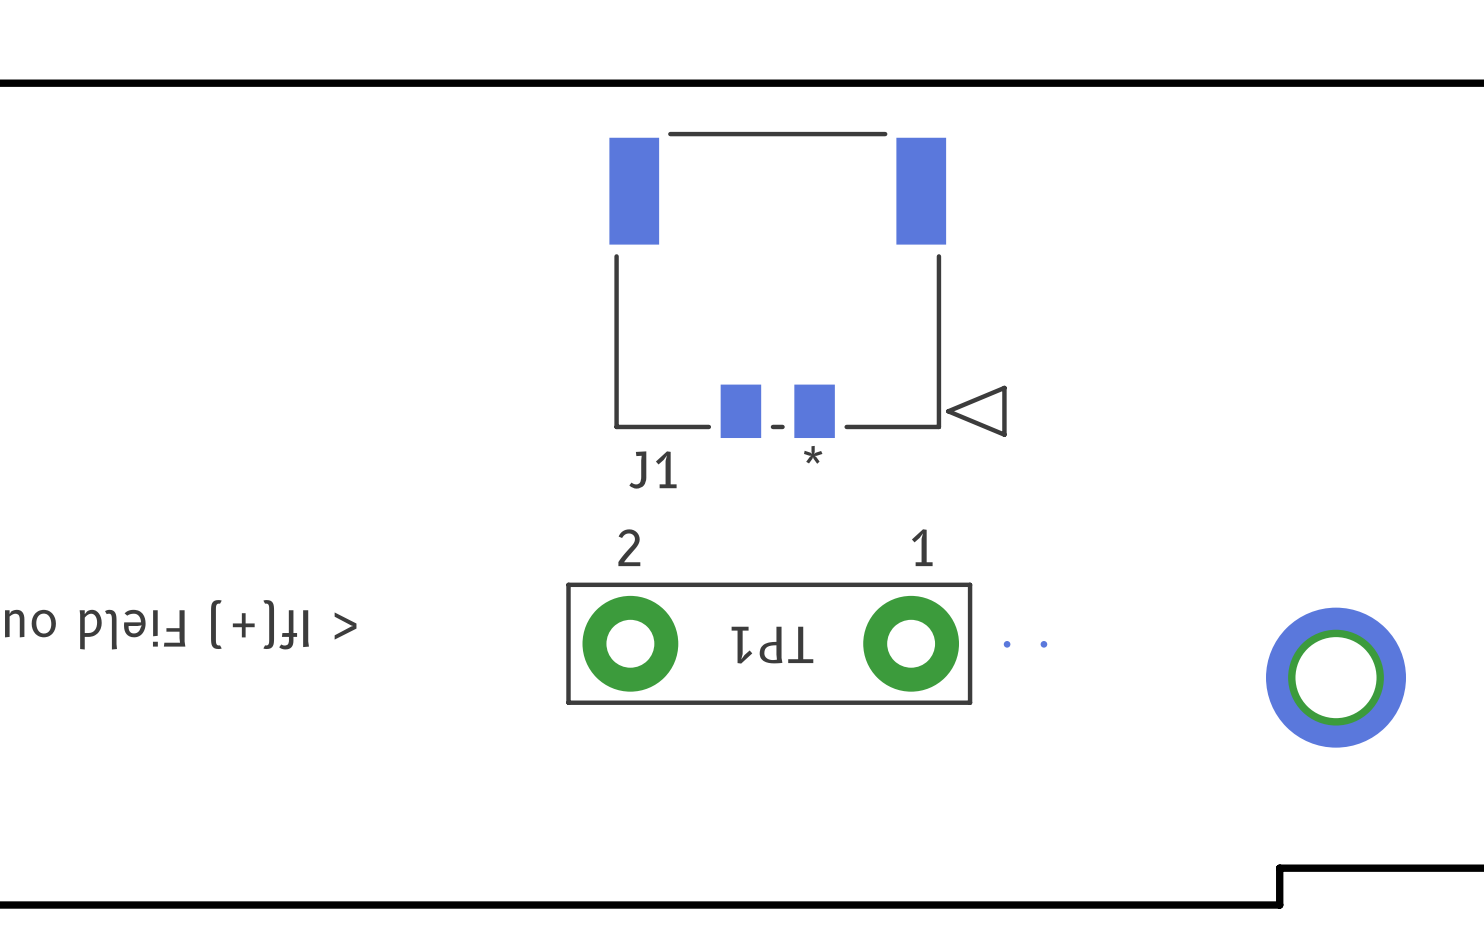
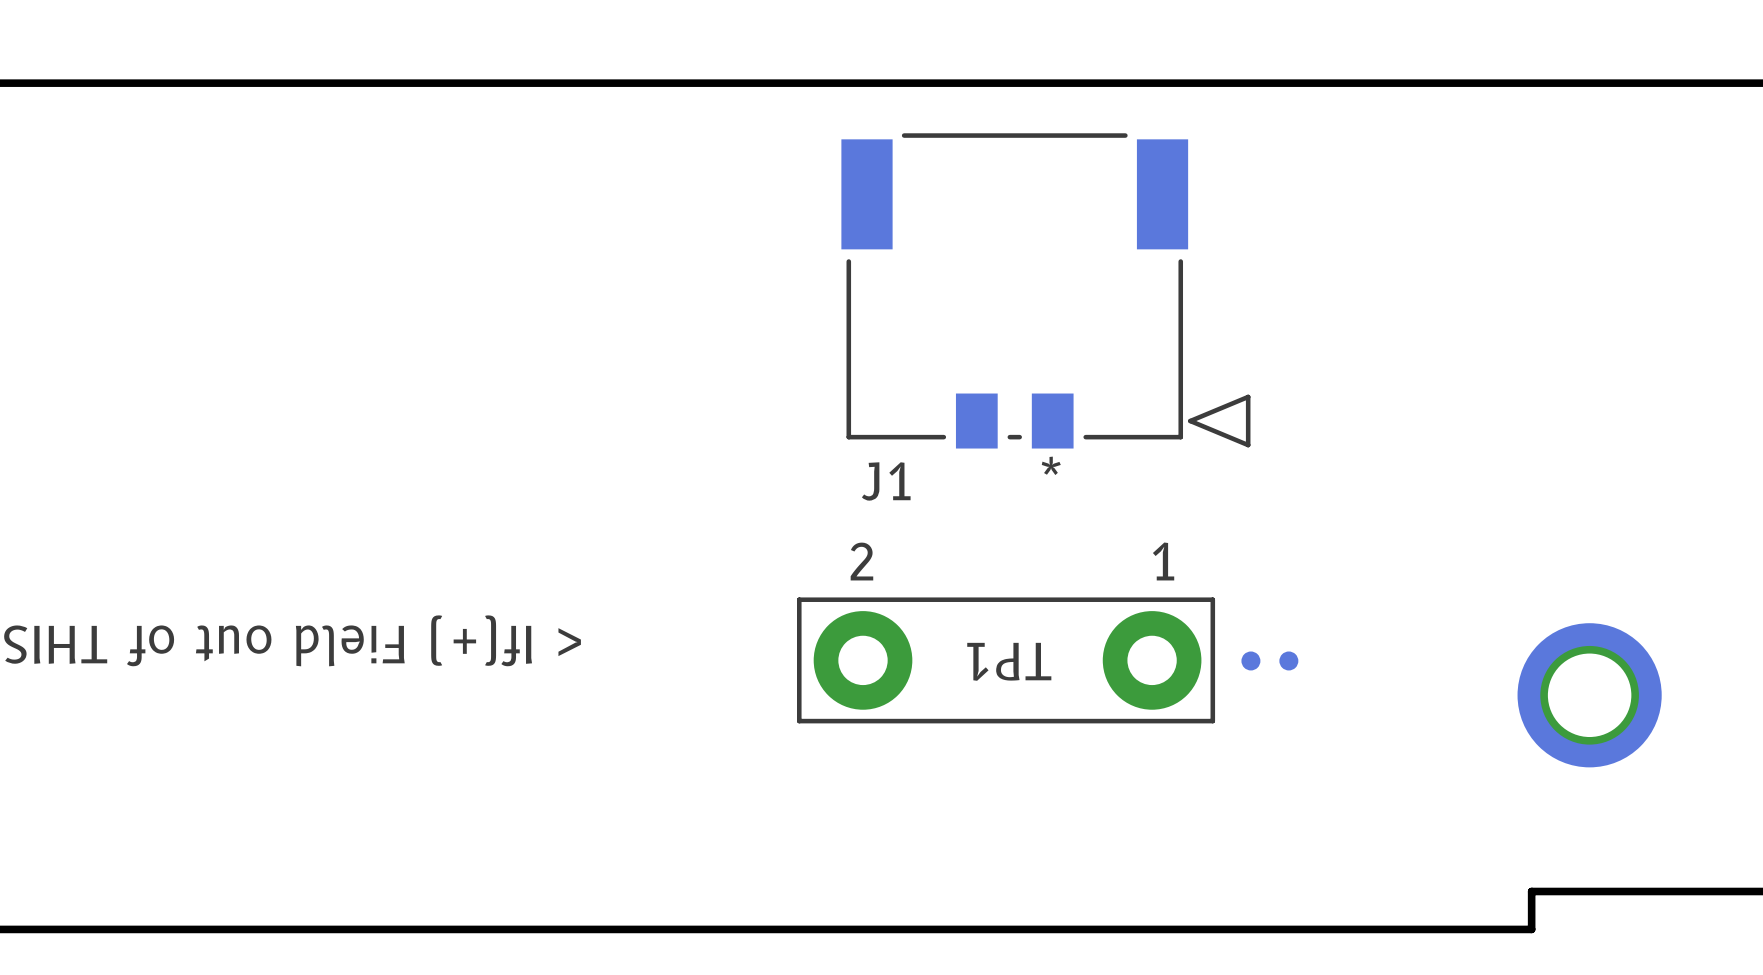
part footprint: [1003, 641, 1048, 648] -> [1241, 651, 1299, 671]

